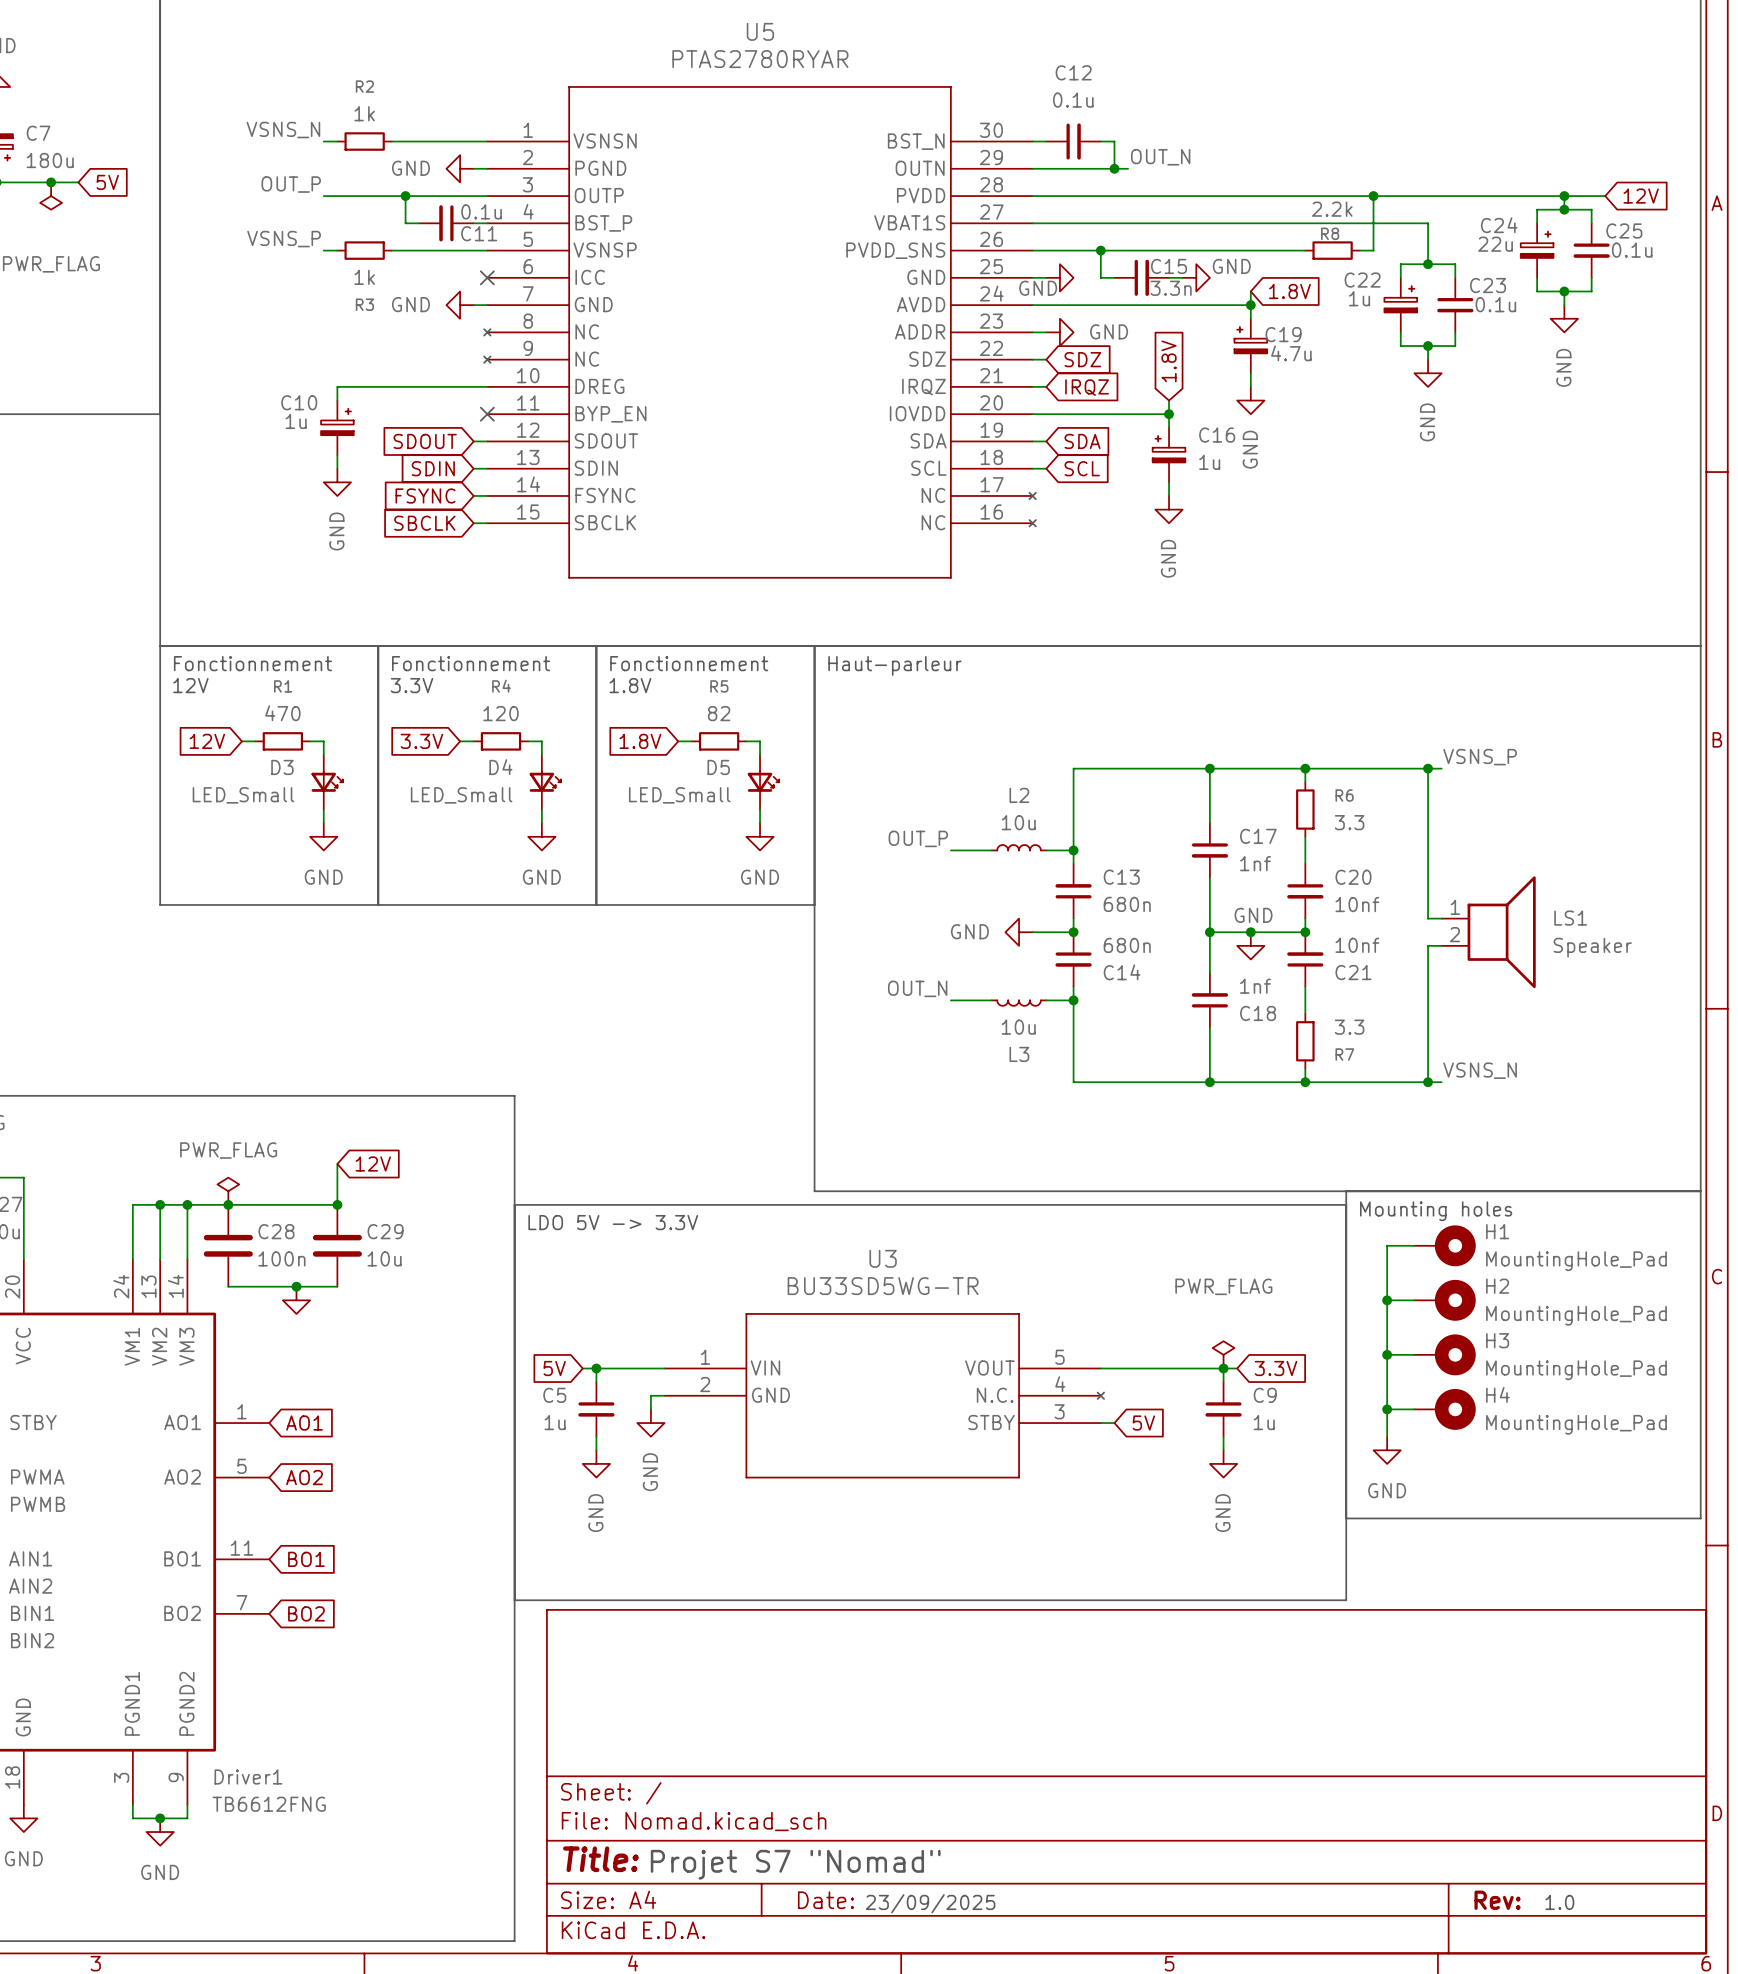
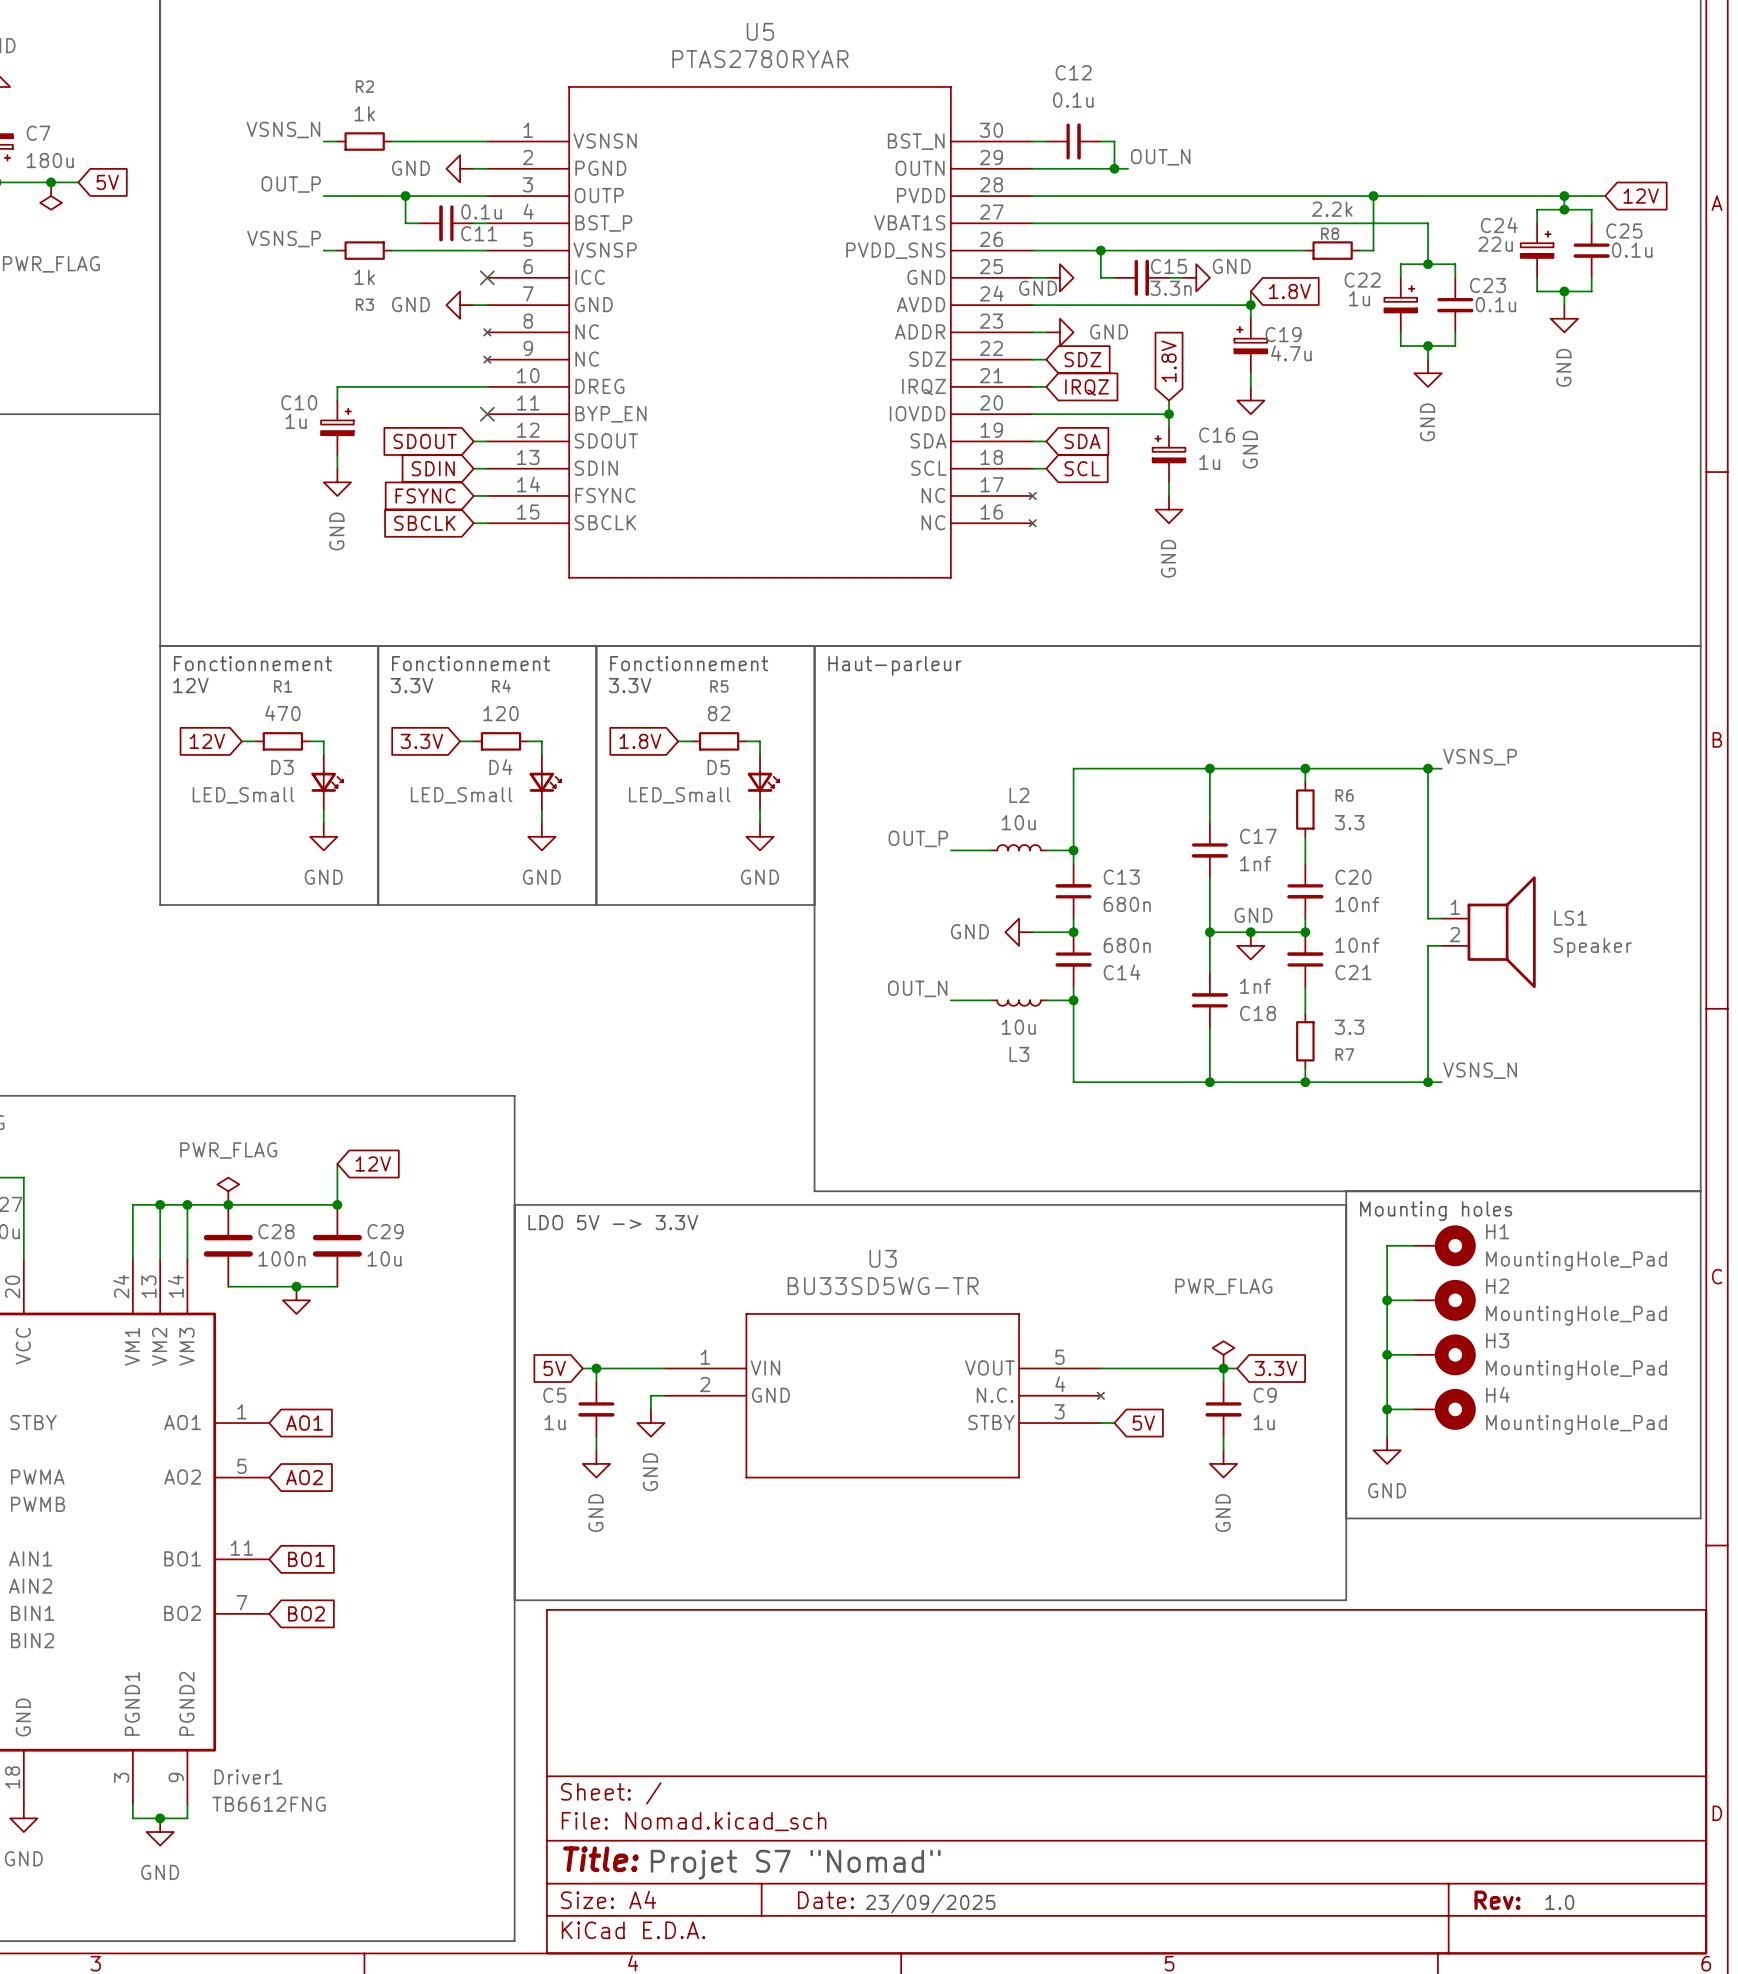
text: 1.8V (630, 685) -> 3.3V (630, 685)

